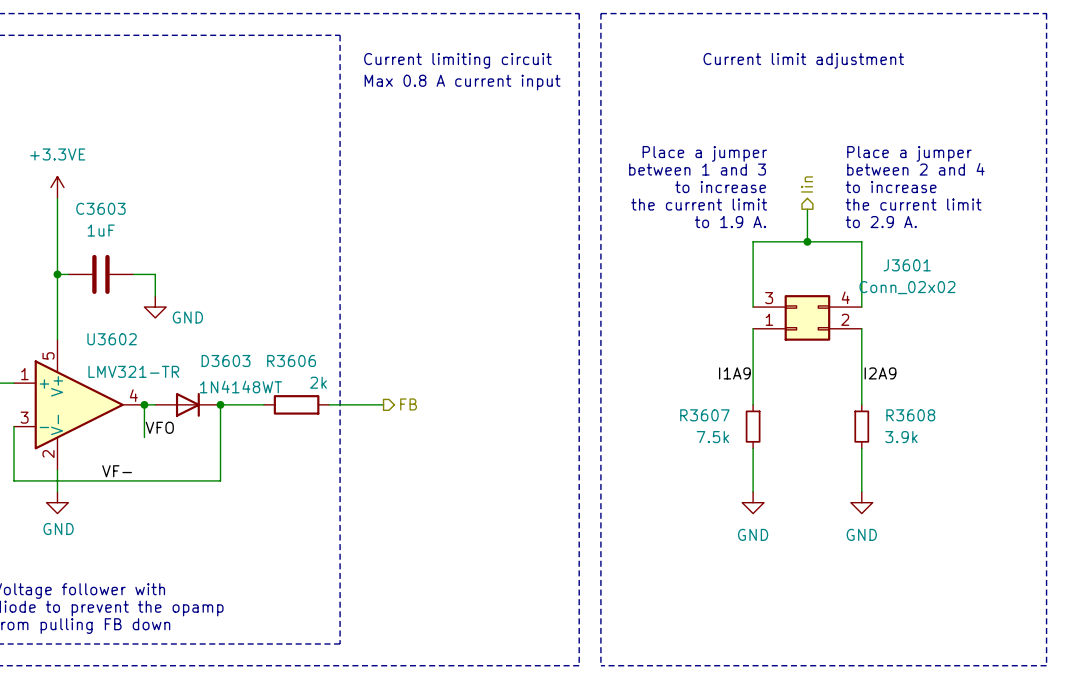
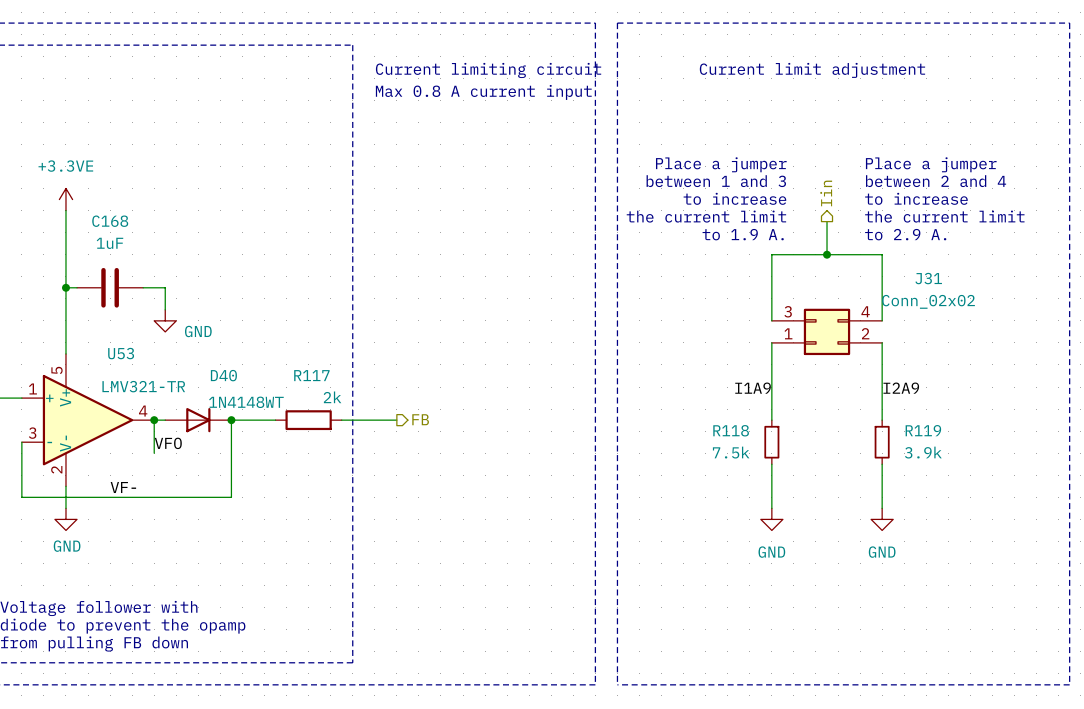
C3603 name: C3603 (100, 208) -> C168 (110, 221)
J3601 name: J3601 (907, 265) -> J31 (928, 278)
U3602 name: U3602 (112, 339) -> U53 (121, 353)
D3603 name: D3603 (226, 360) -> D40 (223, 375)
R3606 name: R3606 (291, 360) -> R117 (311, 375)
R3607 name: R3607 (704, 415) -> R118 (731, 430)
R3608 name: R3608 (910, 415) -> R119 (923, 430)

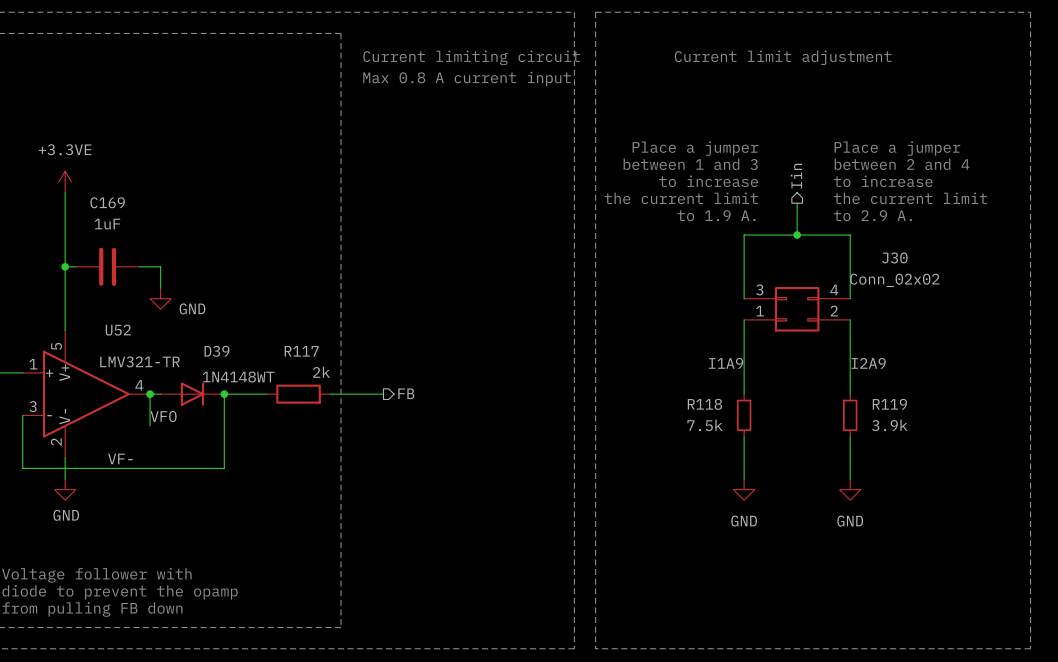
C168 name: C168 (110, 221) -> C169 (107, 202)
J31 name: J31 (928, 278) -> J30 (894, 257)
U53 name: U53 (121, 353) -> U52 (118, 330)
D40 name: D40 (223, 375) -> D39 (217, 351)

